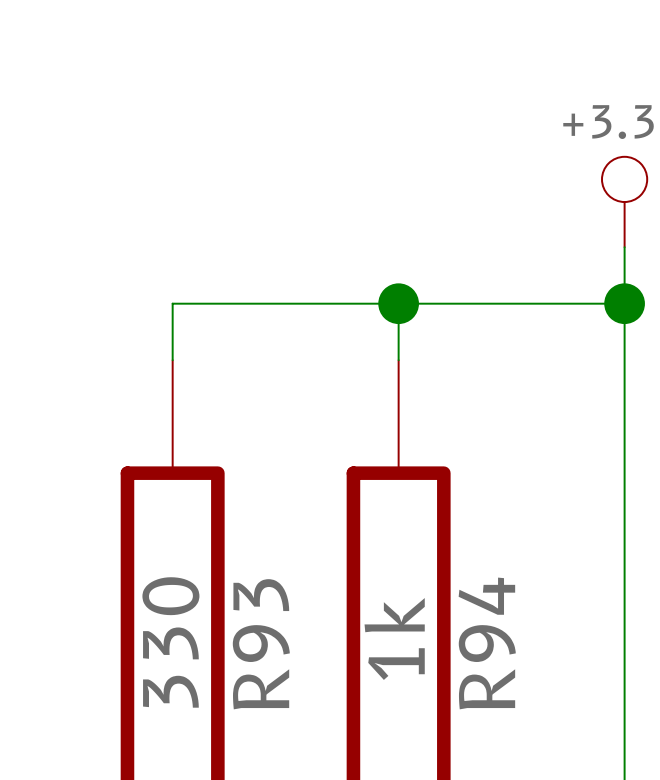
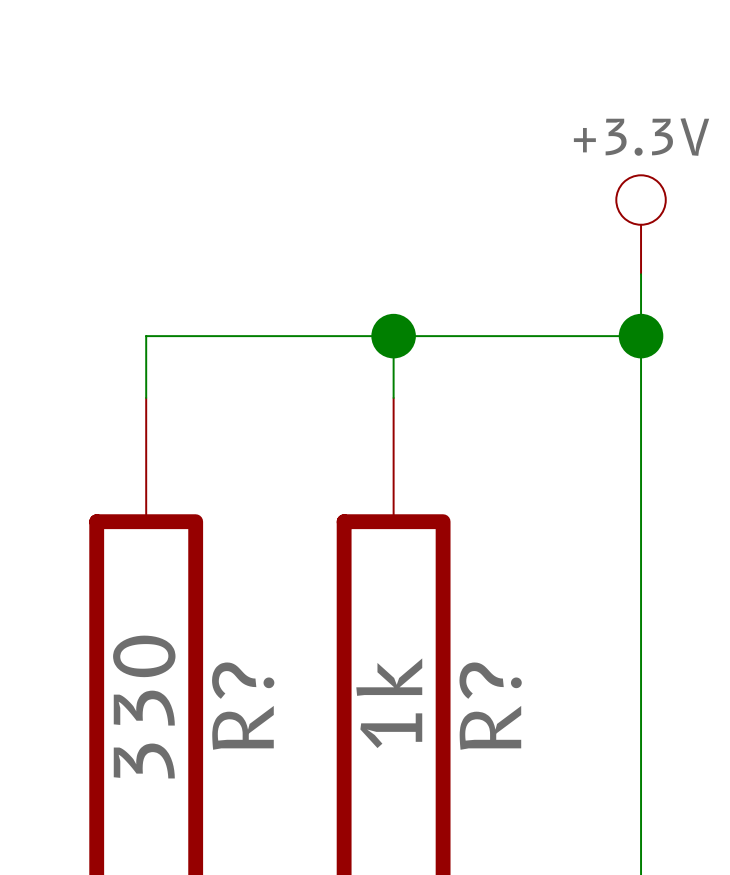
R94 name: R94 (487, 643) -> R? (490, 706)
R93 name: R93 (261, 644) -> R? (243, 706)

